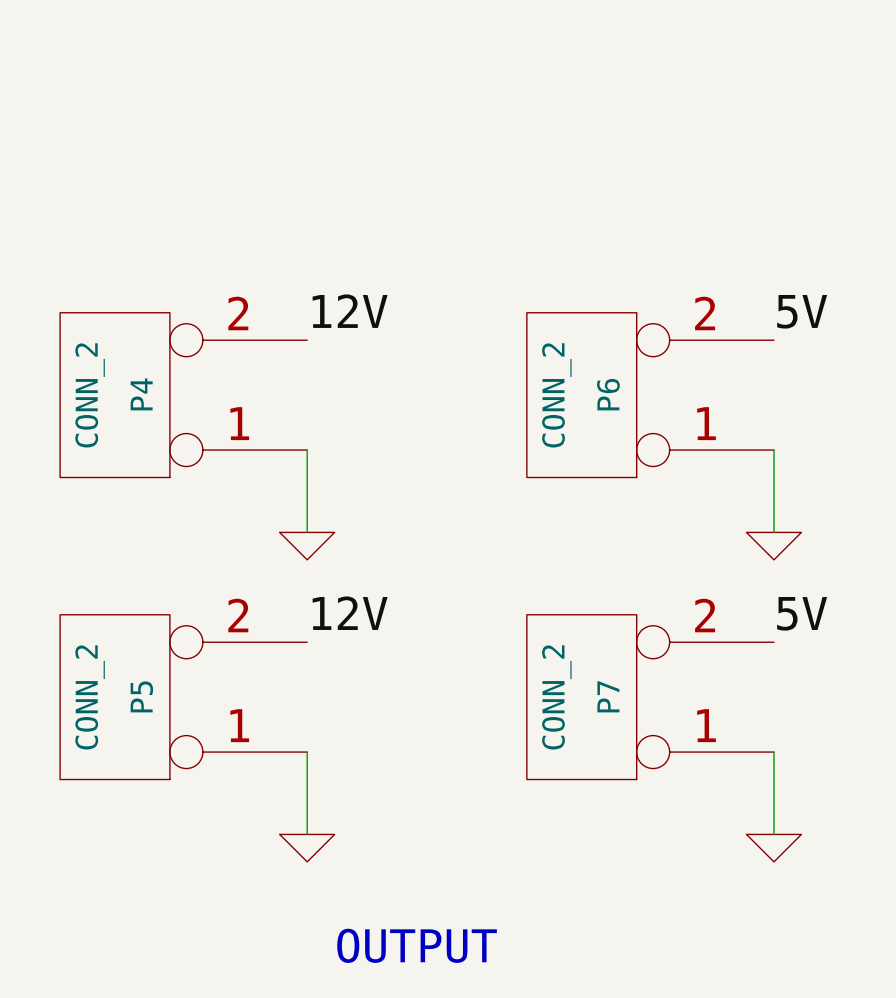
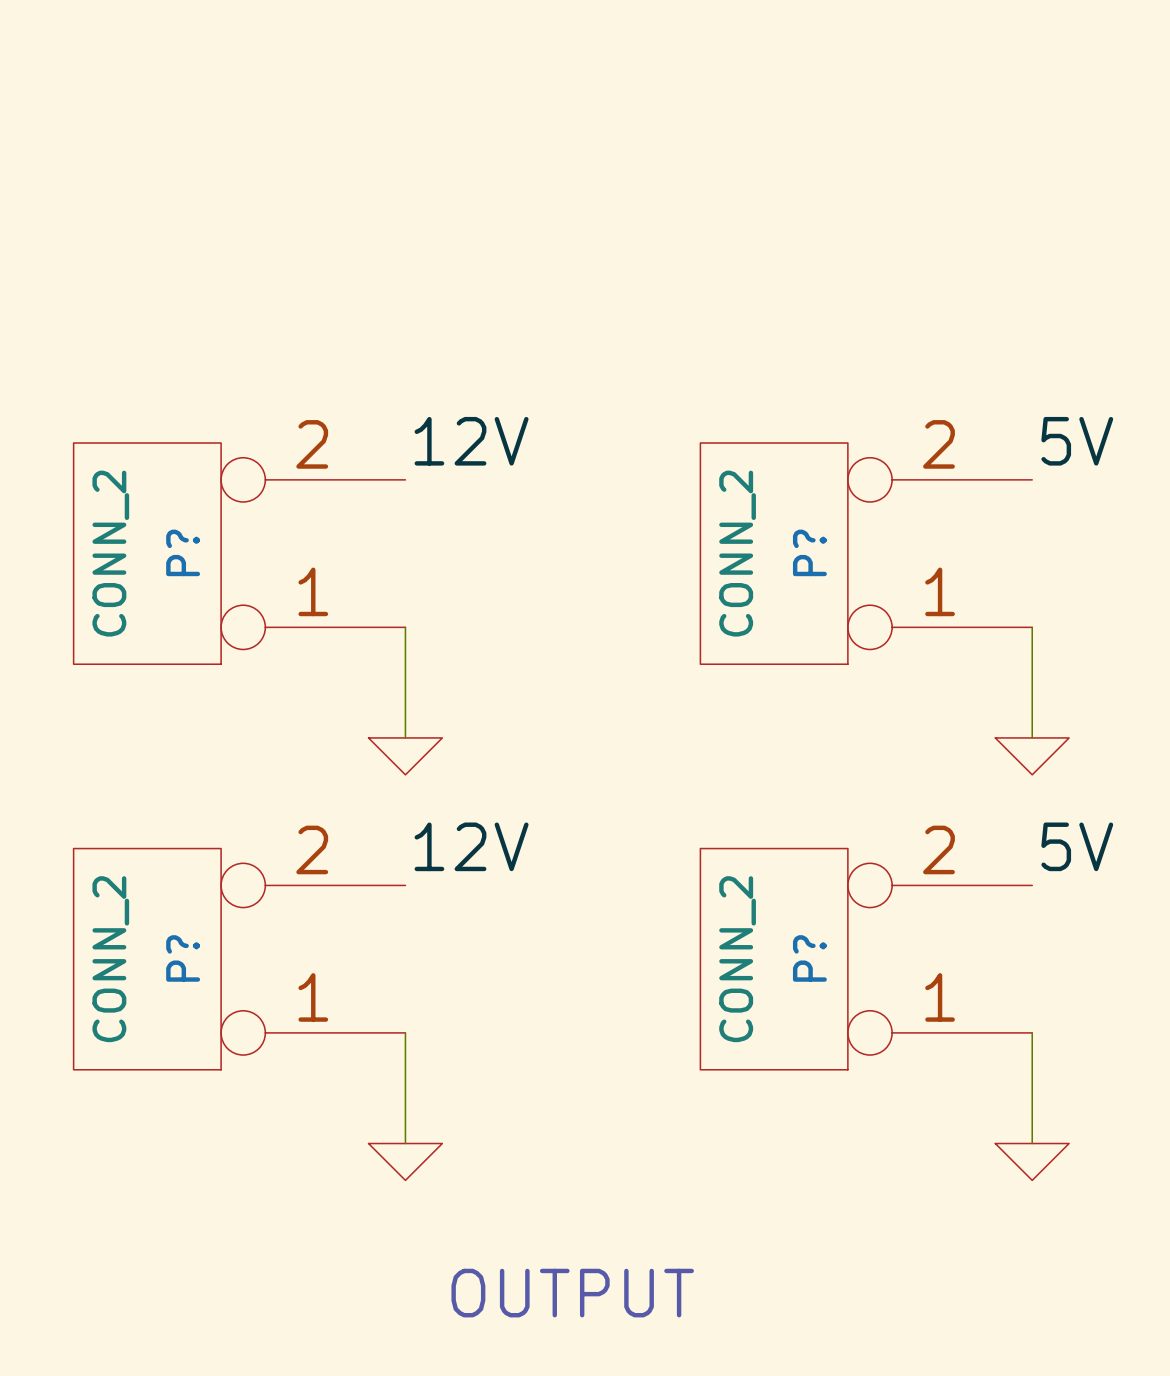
P4 name: P4 (141, 394) -> P? (183, 552)
P6 name: P6 (608, 394) -> P? (809, 552)
P5 name: P5 (141, 696) -> P? (183, 958)
P7 name: P7 (608, 696) -> P? (809, 958)

